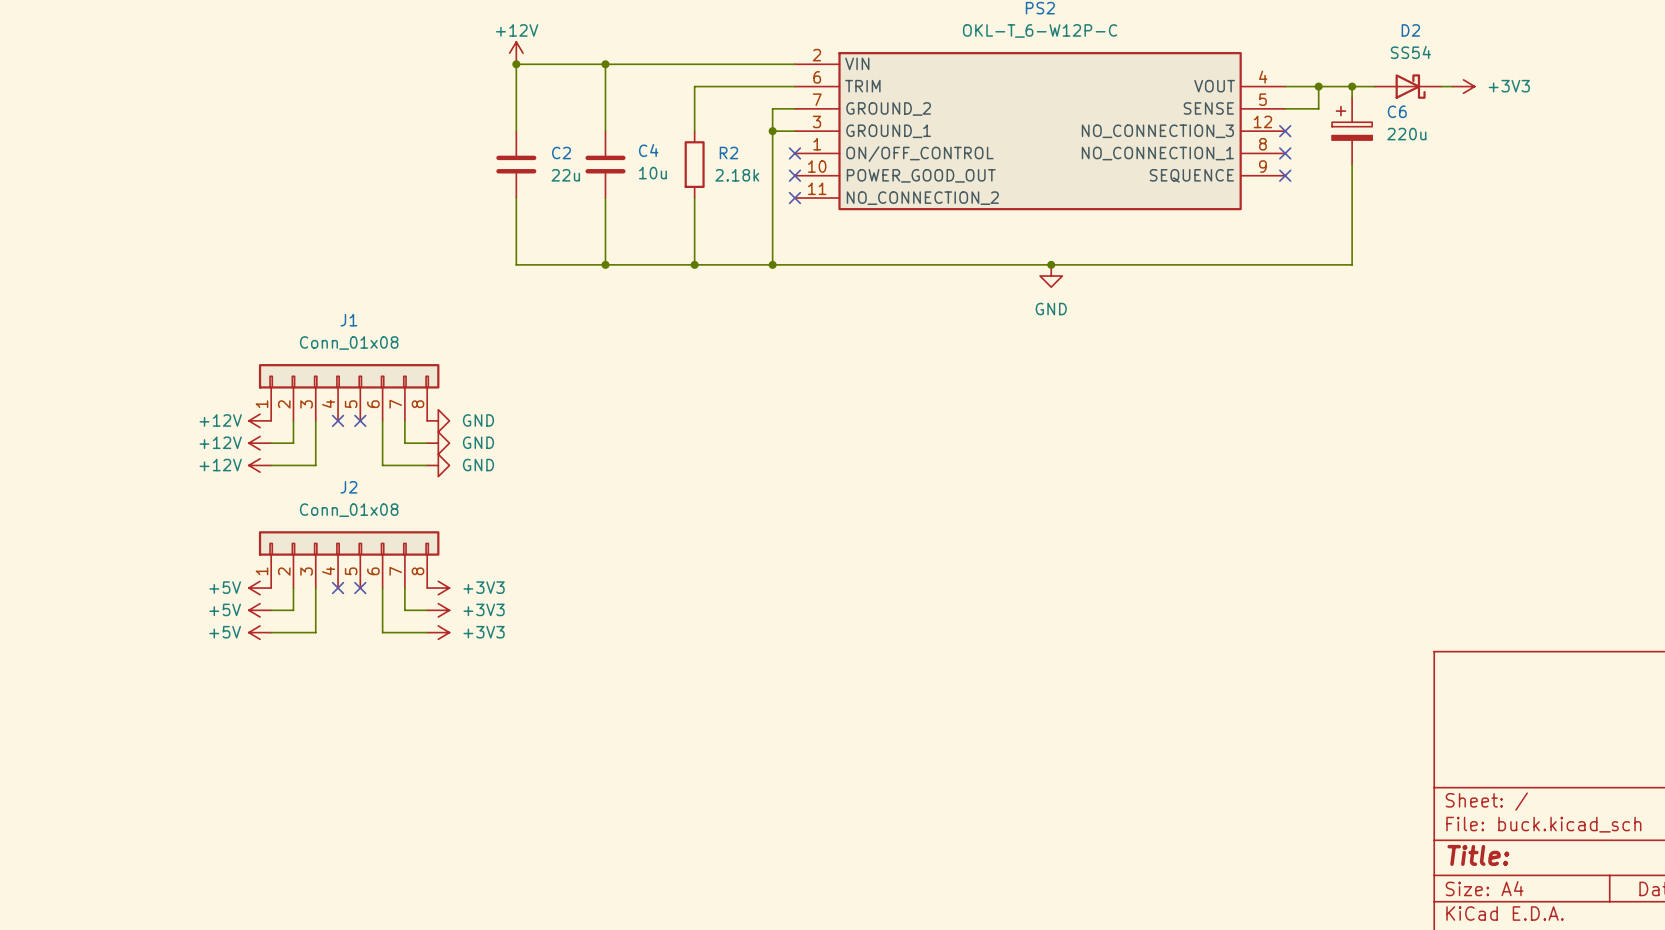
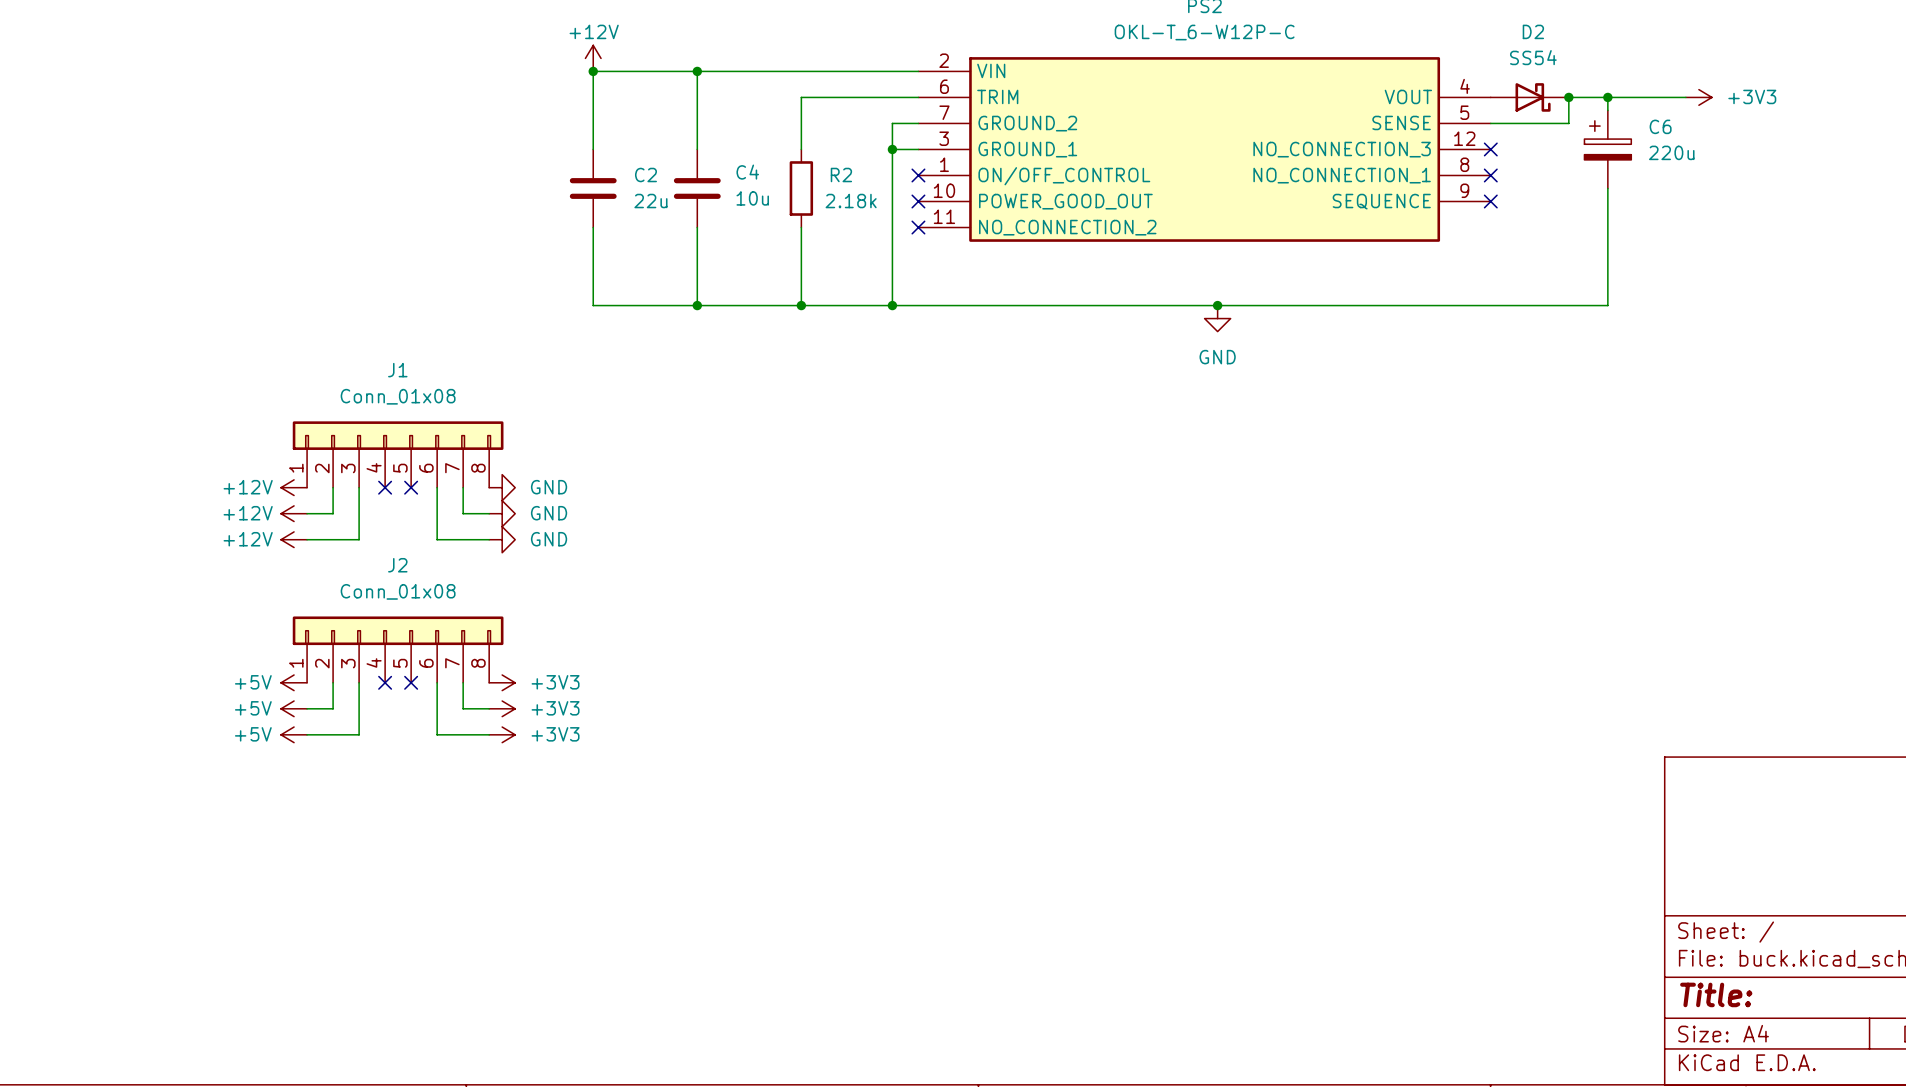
wire: (1318, 86) (1318, 108) -> (1568, 110) (1568, 123) (1529, 123)
junction: (1318, 86) -> none
wire: none -> (1607, 97) (1607, 110)
junction: none -> (1607, 97)
D2 position: (1407, 86) -> (1529, 97)
C6 position: (1352, 131) -> (1607, 149)
wire: (1352, 164) (1352, 264) -> (1607, 188) (1607, 305) (1568, 305)

